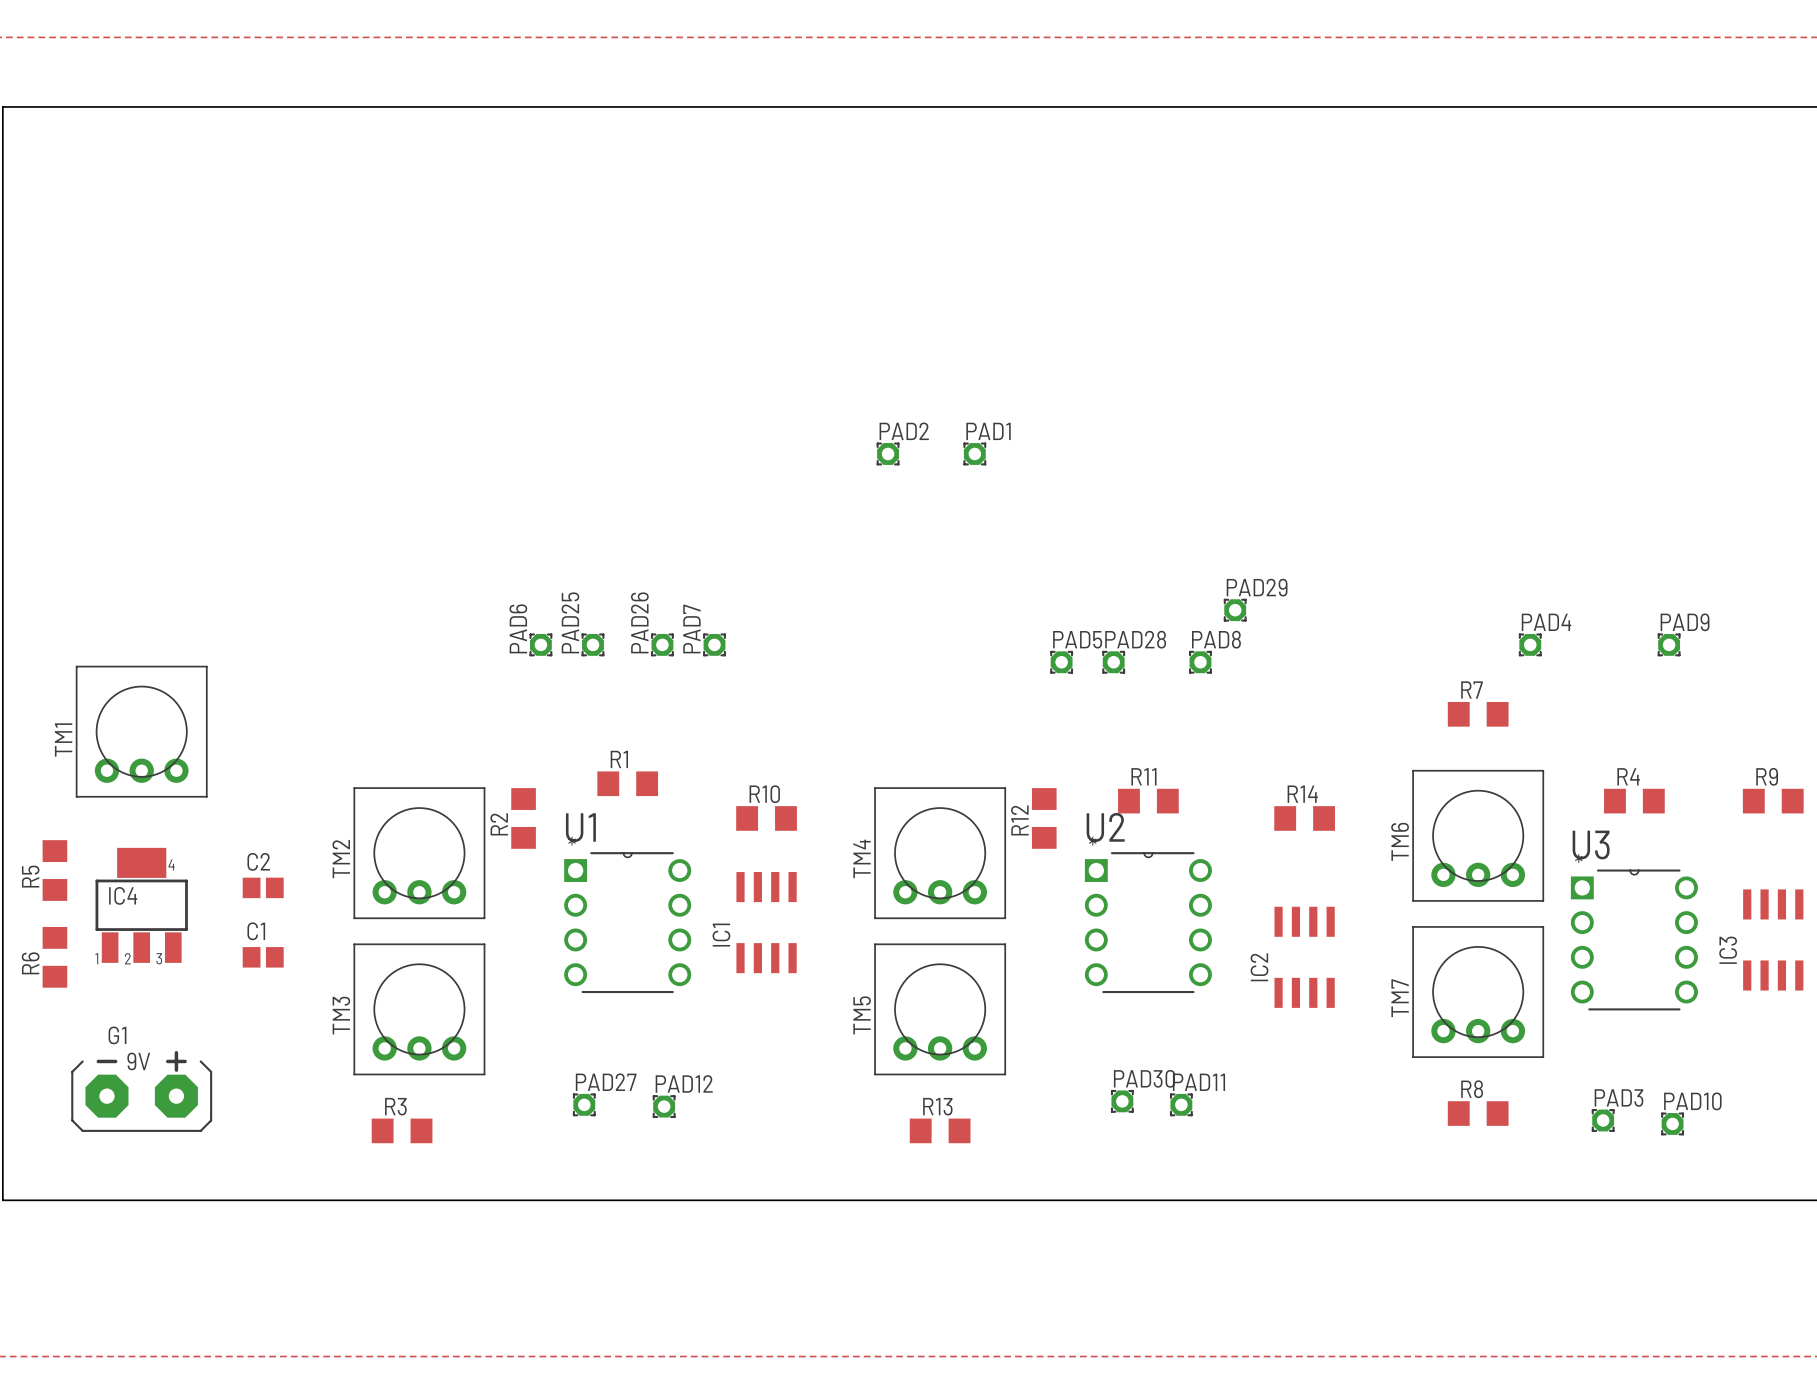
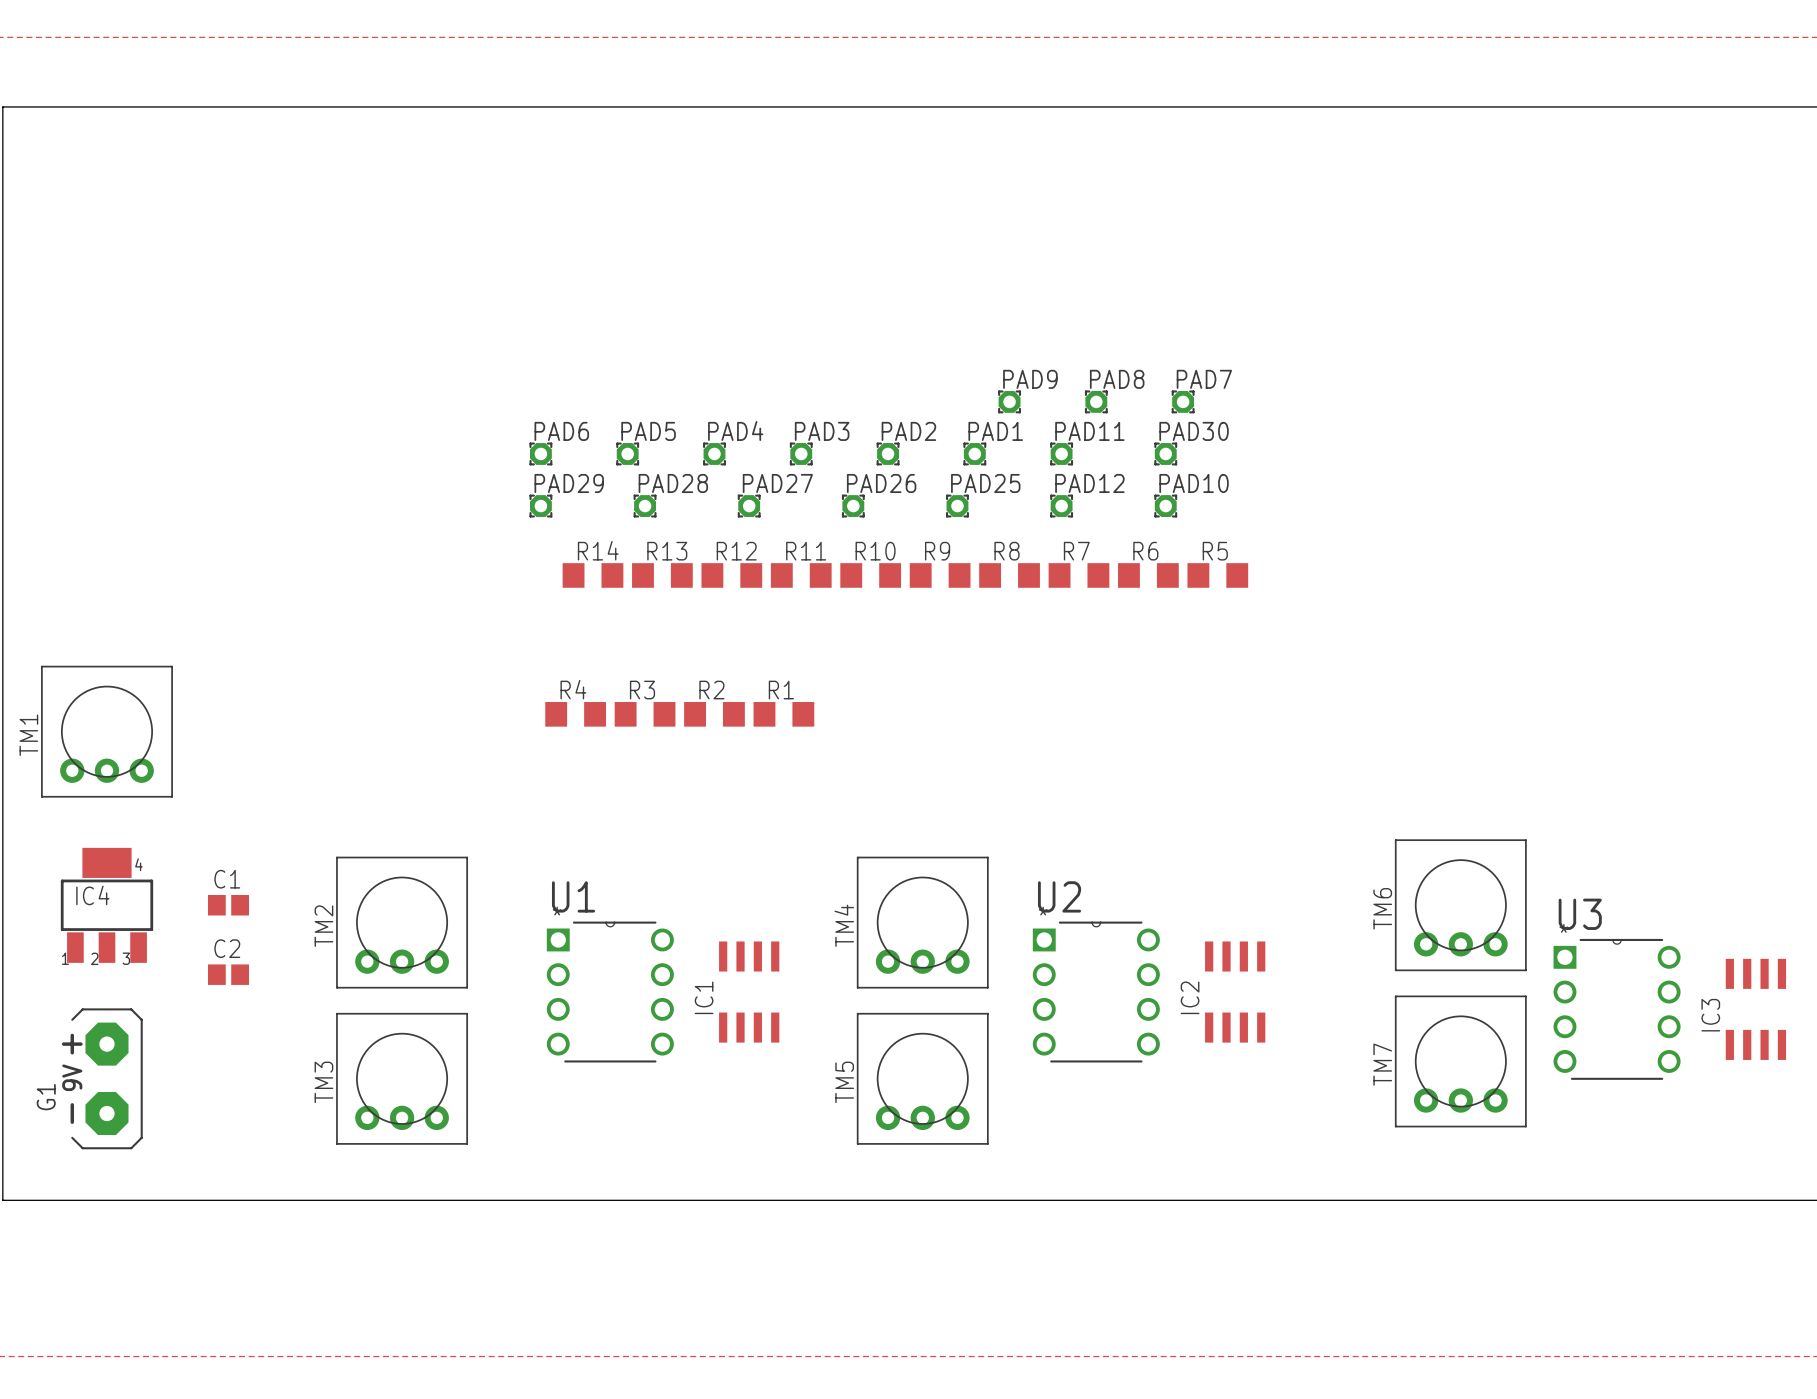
PAD29 position: (1235, 610) -> (540, 506)
PAD25 name rotation: 0° (570, 622) -> 90° clockwise (985, 483)
PAD26 name rotation: 0° (639, 622) -> 90° clockwise (881, 483)
PAD6 name rotation: 0° (518, 628) -> 90° clockwise (561, 431)
PAD7 name rotation: 0° (691, 629) -> 90° clockwise (1204, 379)
PAD6 position: (540, 644) -> (540, 453)
PAD25 position: (592, 644) -> (957, 506)
PAD26 position: (662, 644) -> (853, 506)
PAD7 position: (714, 644) -> (1183, 401)
PAD4 position: (1530, 644) -> (714, 453)
PAD9 position: (1669, 644) -> (1009, 401)
PAD5 position: (1061, 662) -> (627, 453)
PAD28 position: (1113, 662) -> (645, 506)
PAD8 position: (1200, 662) -> (1096, 401)
R7 position: (1478, 714) -> (1078, 575)
TM1 position: (141, 731) -> (106, 731)
R1 position: (627, 783) -> (783, 714)
R11 position: (1148, 801) -> (801, 575)
R4 position: (1634, 801) -> (575, 714)
R9 position: (1773, 801) -> (940, 575)
R2 rotation: 0° (523, 818) -> 90° clockwise (714, 714)
R2 position: (523, 818) -> (714, 714)
R10 position: (766, 818) -> (870, 575)
R12 rotation: 0° (1044, 818) -> 90° clockwise (731, 575)
R12 position: (1044, 818) -> (731, 575)
R14 position: (1304, 818) -> (592, 575)
TM6 position: (1478, 835) -> (1460, 905)
TM2 position: (419, 853) -> (402, 922)
TM4 position: (940, 853) -> (922, 922)
R5 rotation: 0° (54, 870) -> 90° clockwise (1217, 575)
R5 position: (54, 870) -> (1217, 575)
C2 position: (263, 887) -> (228, 974)
IC4 position: (141, 905) -> (106, 905)
U1 position: (627, 922) -> (610, 992)
IC1 position: (766, 922) -> (749, 992)
U2 position: (1148, 922) -> (1096, 992)
U3 position: (1634, 939) -> (1617, 1009)
IC3 position: (1773, 939) -> (1755, 1009)
R6 rotation: 0° (54, 957) -> 90° clockwise (1148, 575)
R6 position: (54, 957) -> (1148, 575)
C1 position: (263, 957) -> (228, 905)
IC2 position: (1304, 957) -> (1235, 992)
TM7 position: (1478, 992) -> (1460, 1061)
TM3 position: (419, 1009) -> (402, 1078)
TM5 position: (940, 1009) -> (922, 1078)
G1 rotation: 0° (141, 1091) -> 90° counterclockwise (102, 1078)
PAD30 position: (1122, 1101) -> (1165, 453)
PAD27 position: (584, 1104) -> (749, 506)
PAD11 position: (1181, 1104) -> (1061, 453)
PAD12 position: (664, 1106) -> (1061, 506)
R8 position: (1478, 1113) -> (1009, 575)
PAD3 position: (1603, 1120) -> (801, 453)
PAD10 position: (1672, 1123) -> (1165, 506)
R3 position: (402, 1130) -> (645, 714)
R13 position: (940, 1130) -> (662, 575)

